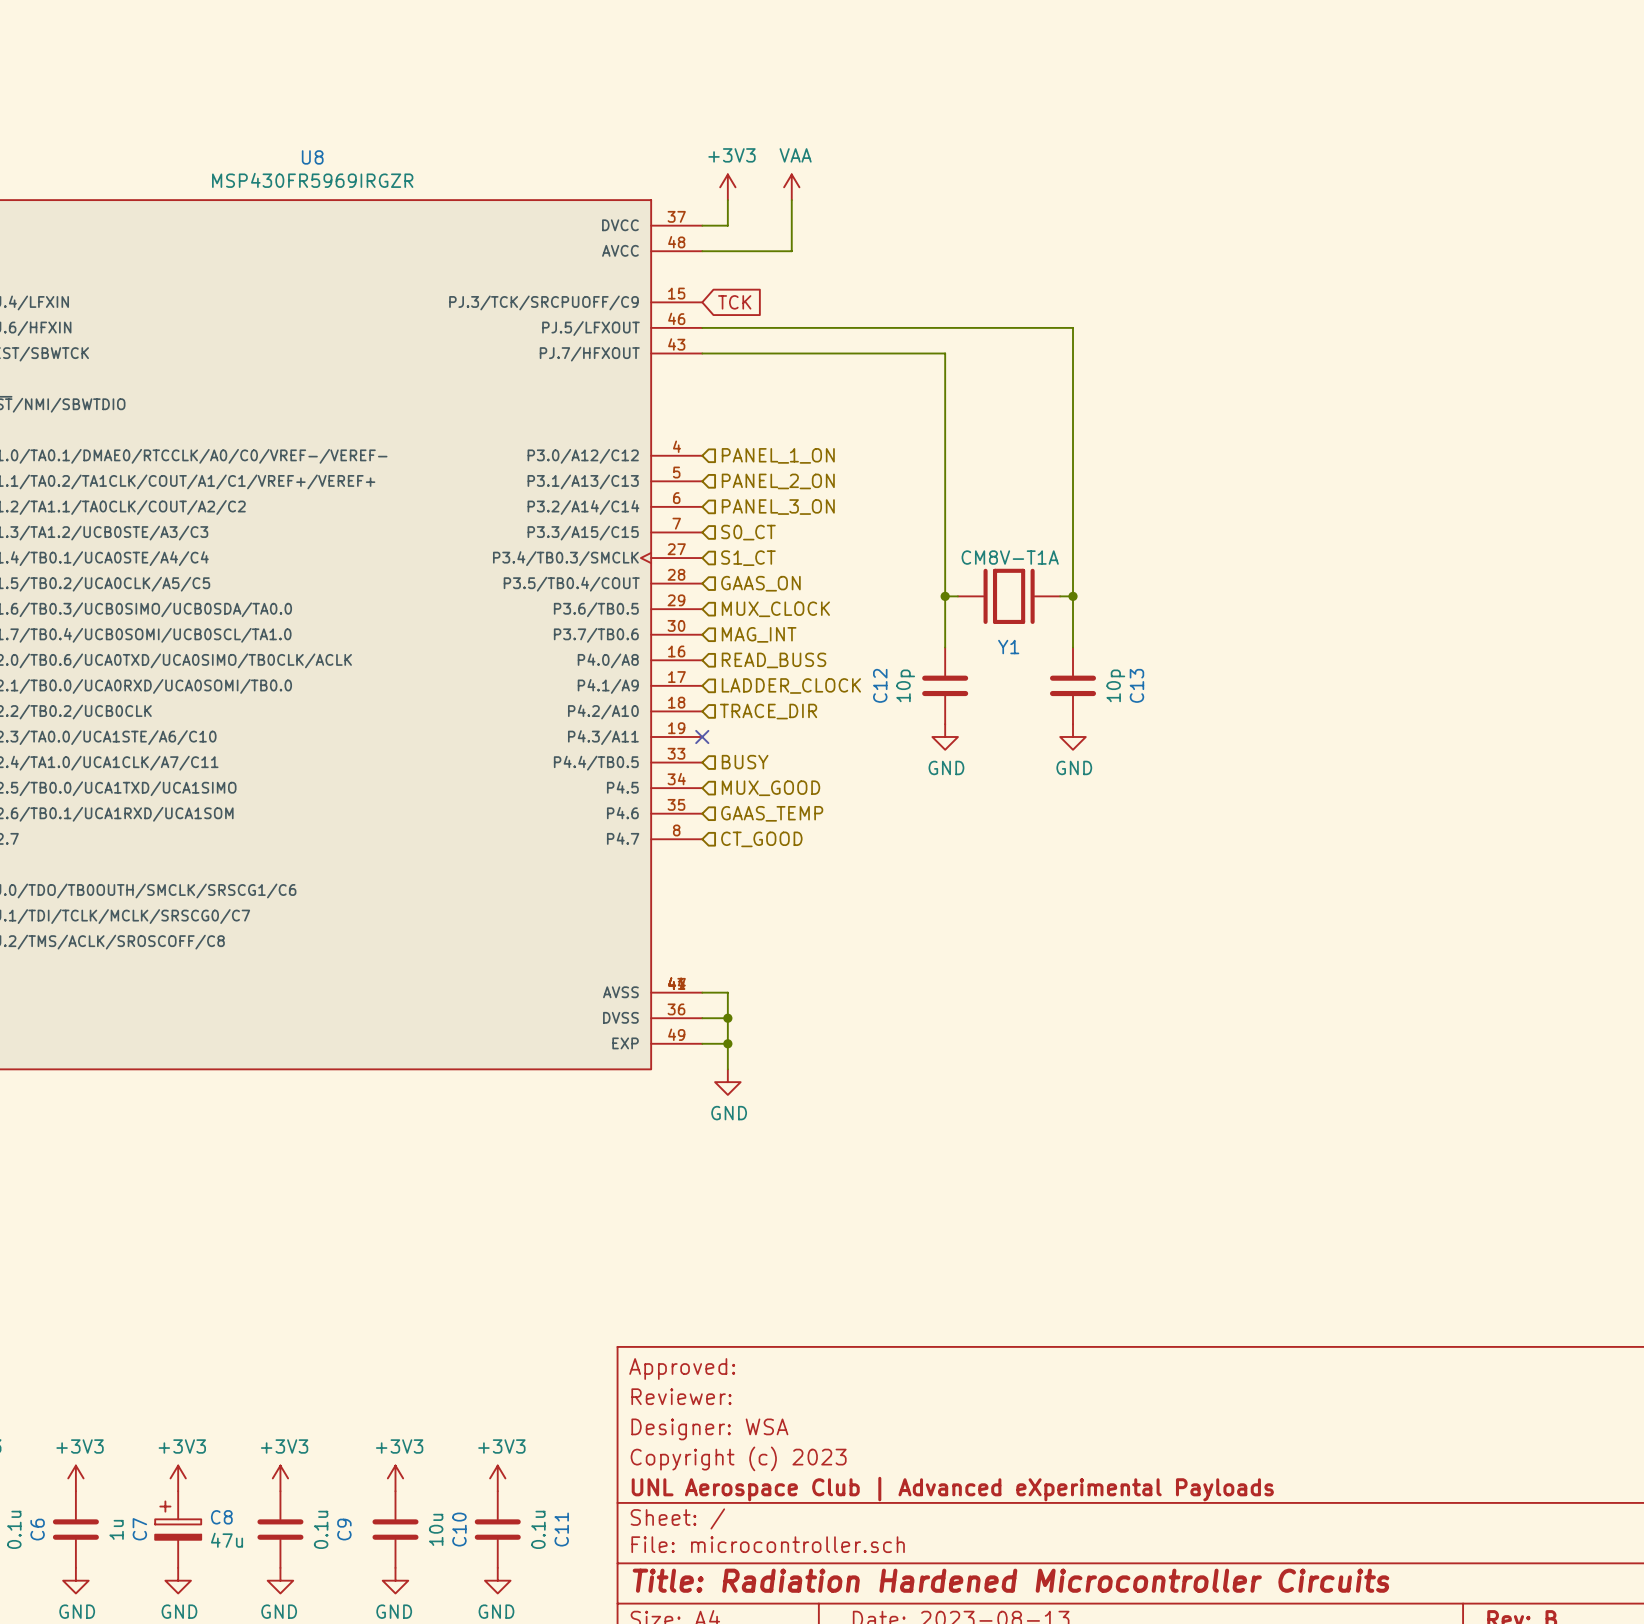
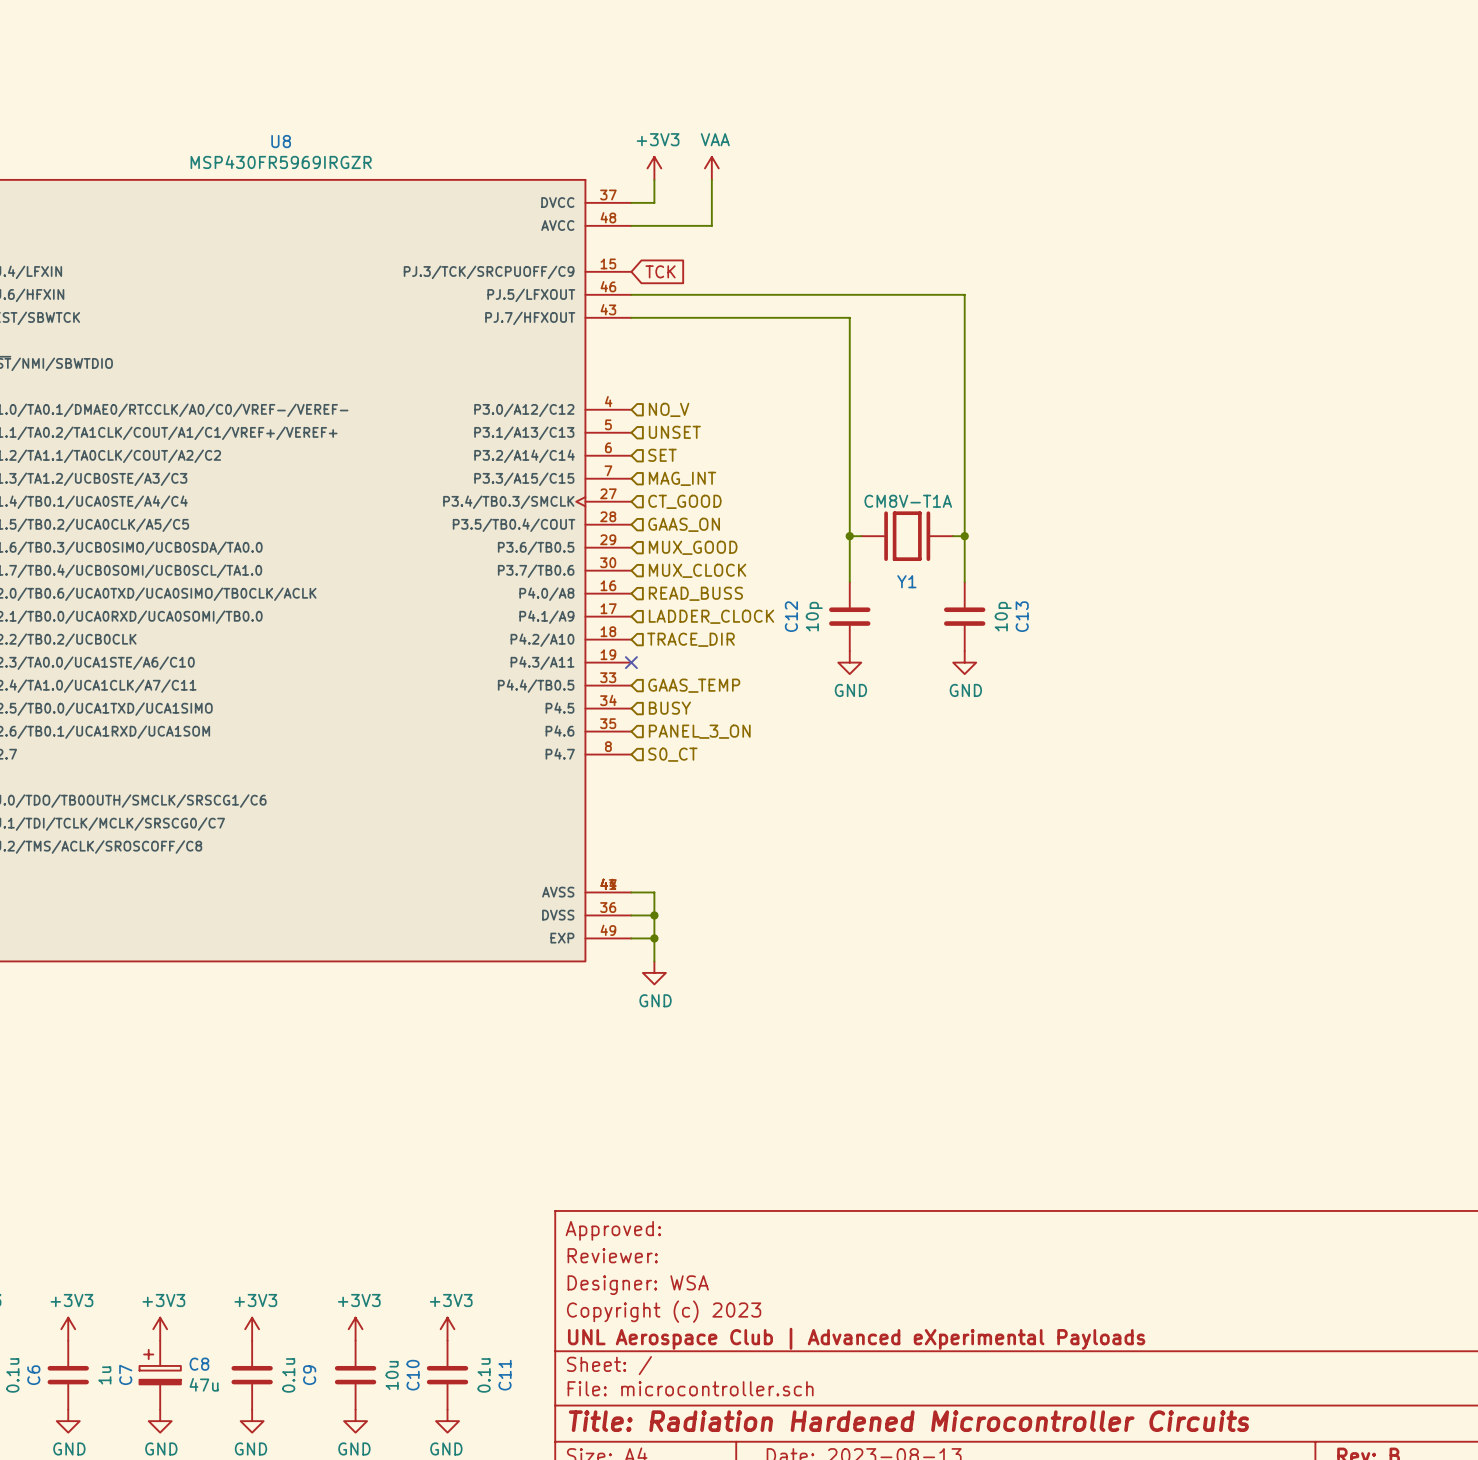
hierarchical label: PANEL_1_ON (778, 455) -> NO_V (669, 409)
hierarchical label: PANEL_2_ON (778, 481) -> UNSET (674, 432)
hierarchical label: PANEL_3_ON (778, 507) -> SET (662, 455)
hierarchical label: S0_CT (748, 532) -> MAG_INT (682, 478)
hierarchical label: S1_CT (748, 558) -> CT_GOOD (684, 501)
hierarchical label: MUX_CLOCK (775, 609) -> MUX_GOOD (693, 547)
hierarchical label: MAG_INT (759, 634) -> MUX_CLOCK (697, 570)
hierarchical label: BUSY (745, 762) -> GAAS_TEMP (694, 685)
hierarchical label: MUX_GOOD (770, 788) -> BUSY (669, 708)
hierarchical label: GAAS_TEMP (772, 813) -> PANEL_3_ON (699, 731)
hierarchical label: CT_GOOD (761, 839) -> S0_CT (672, 754)

